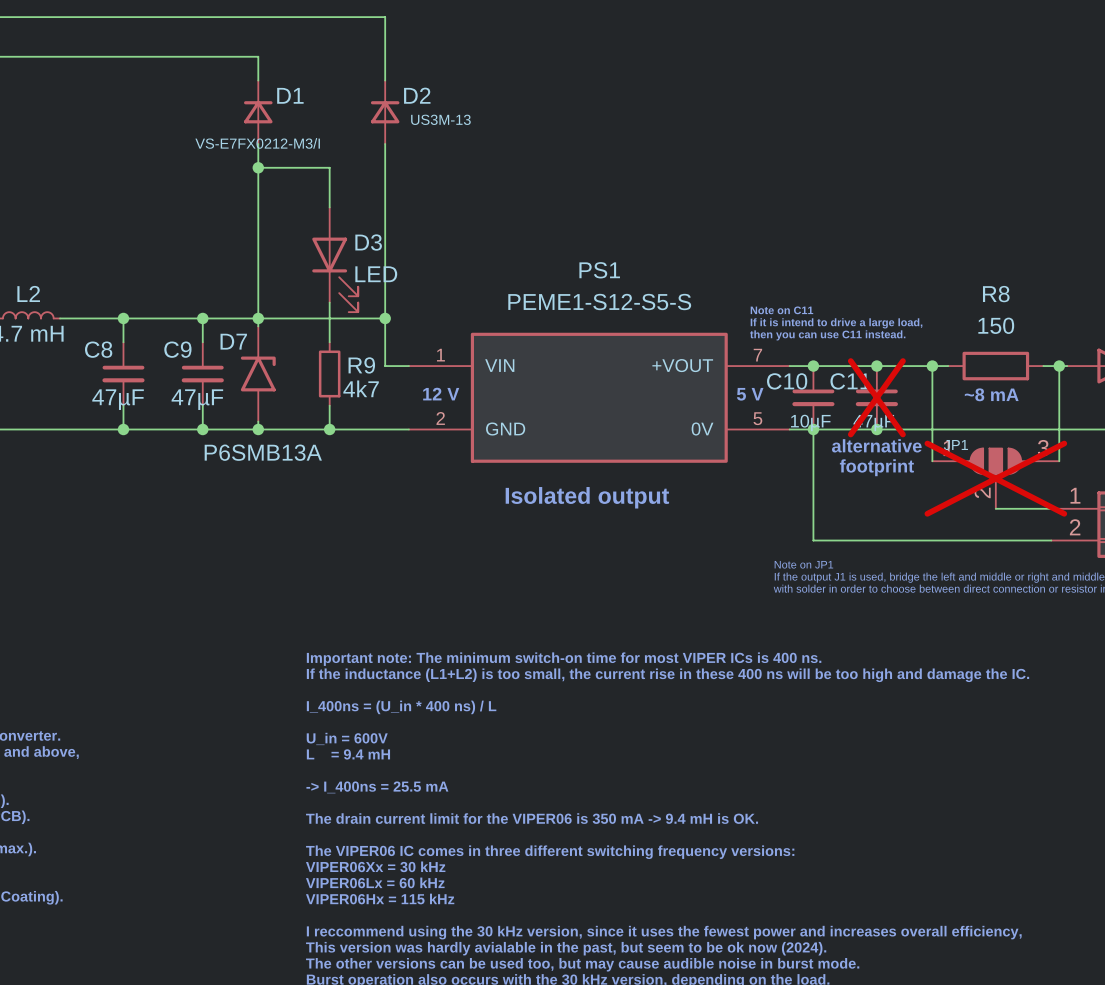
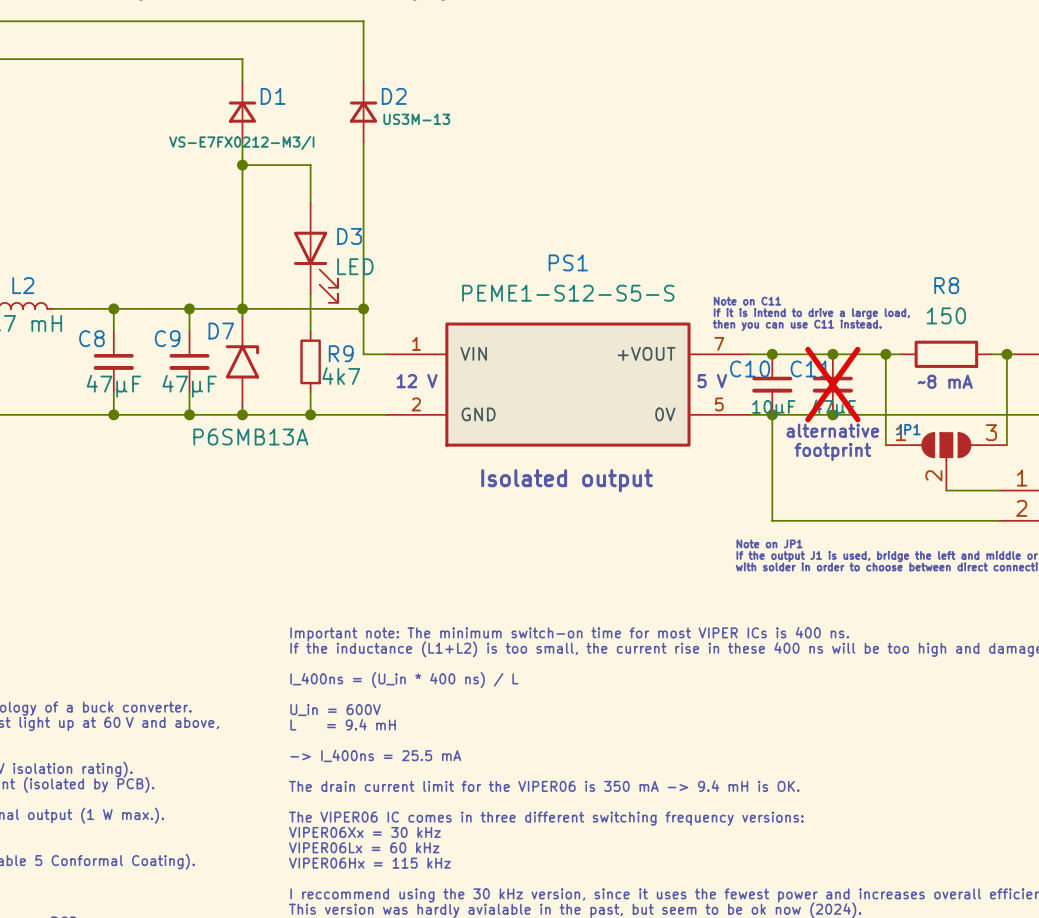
JP1 do-not-place cross: (995, 478) -> none

